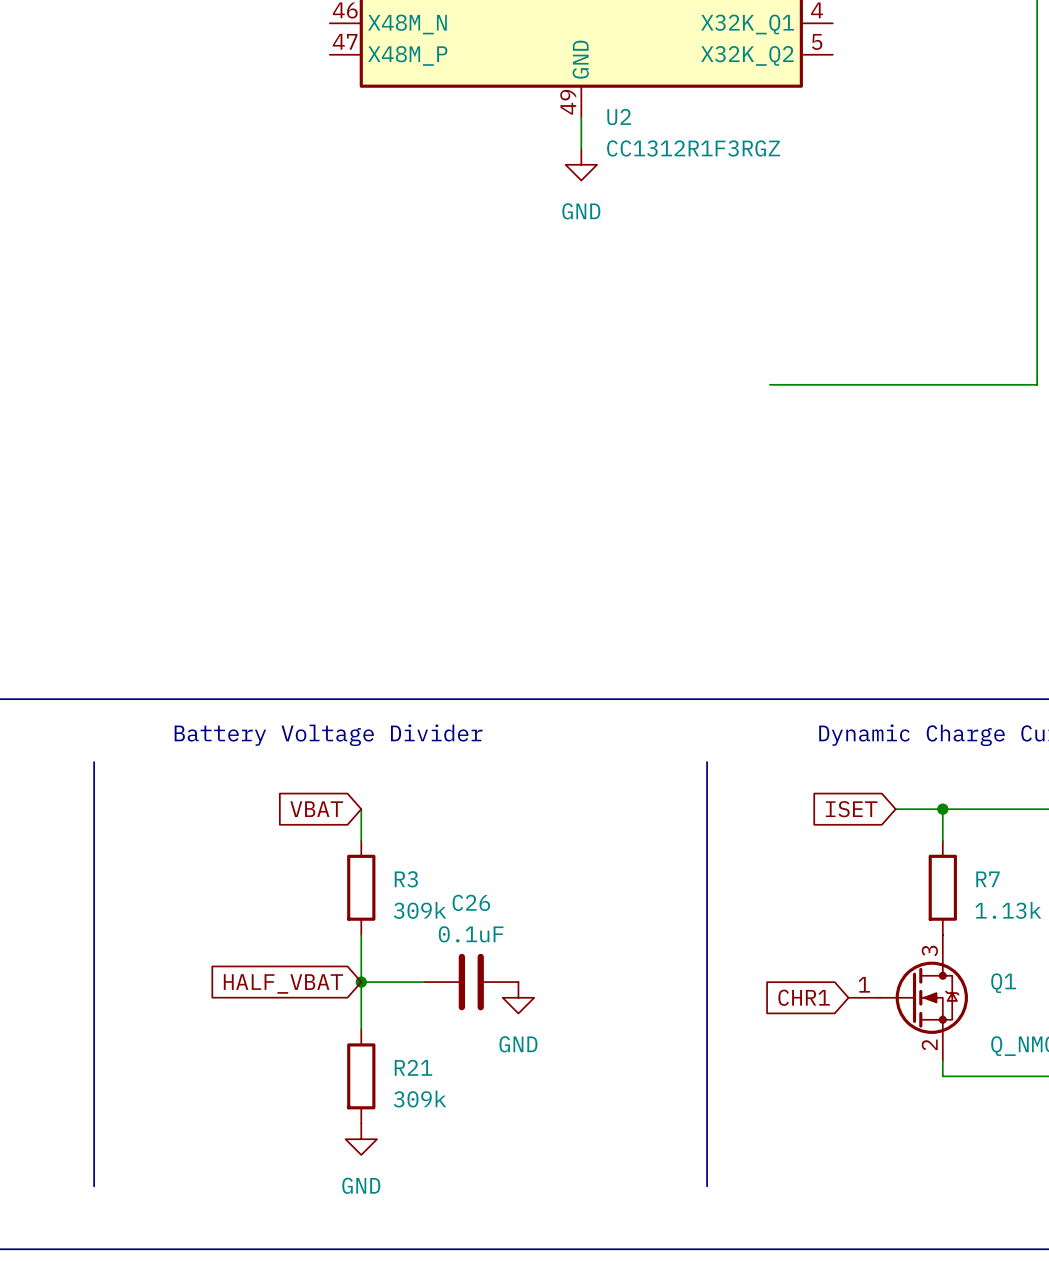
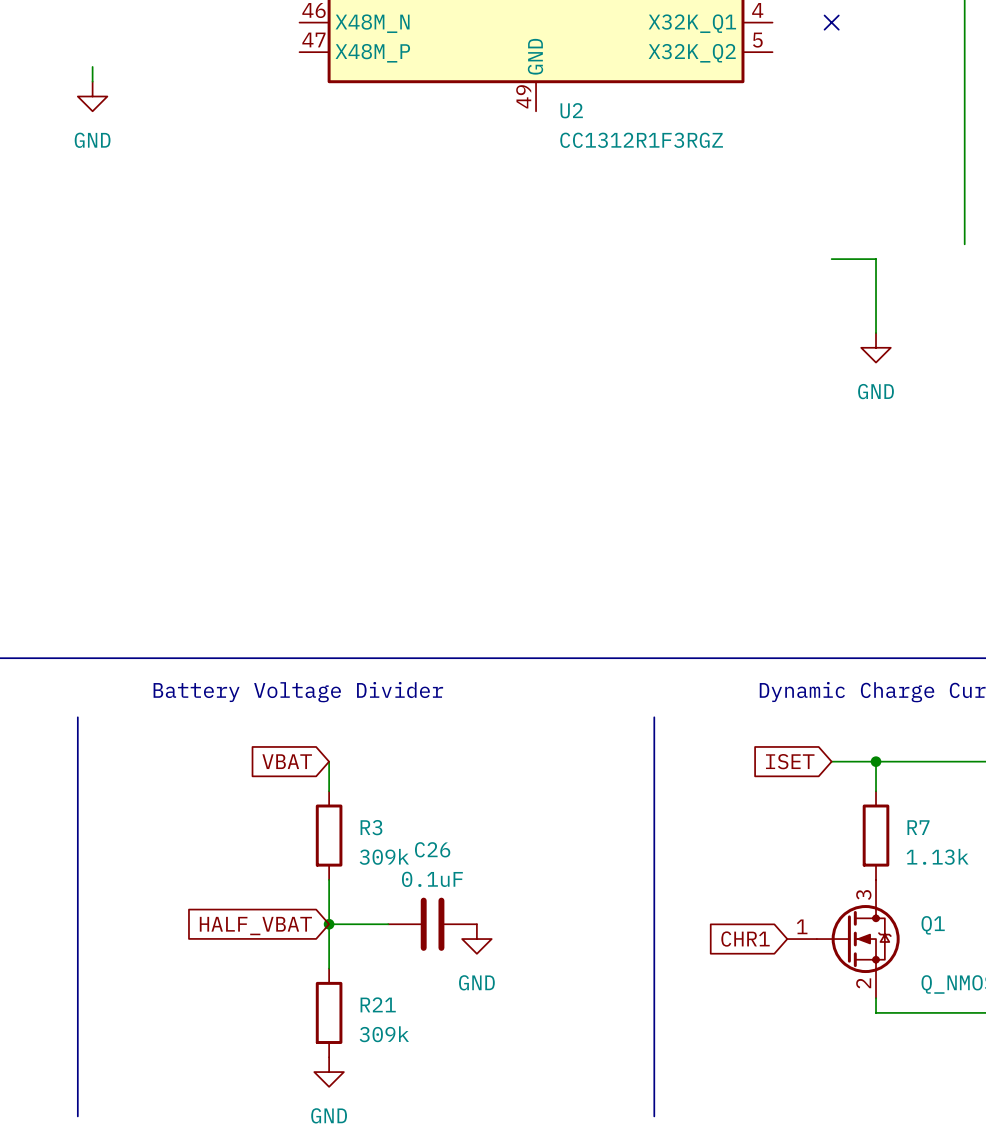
no-connect mark: none -> (831, 22)
wire: none -> (92, 66) (92, 81)
power symbol: none -> GND (92, 96)
wire: (581, 117) (581, 149) -> none
power symbol: GND (581, 164) -> none
wire: (1037, 259) (1037, 384) (769, 384) -> none
wire: none -> (831, 259) (876, 259) (876, 333)
power symbol: none -> GND (876, 347)

